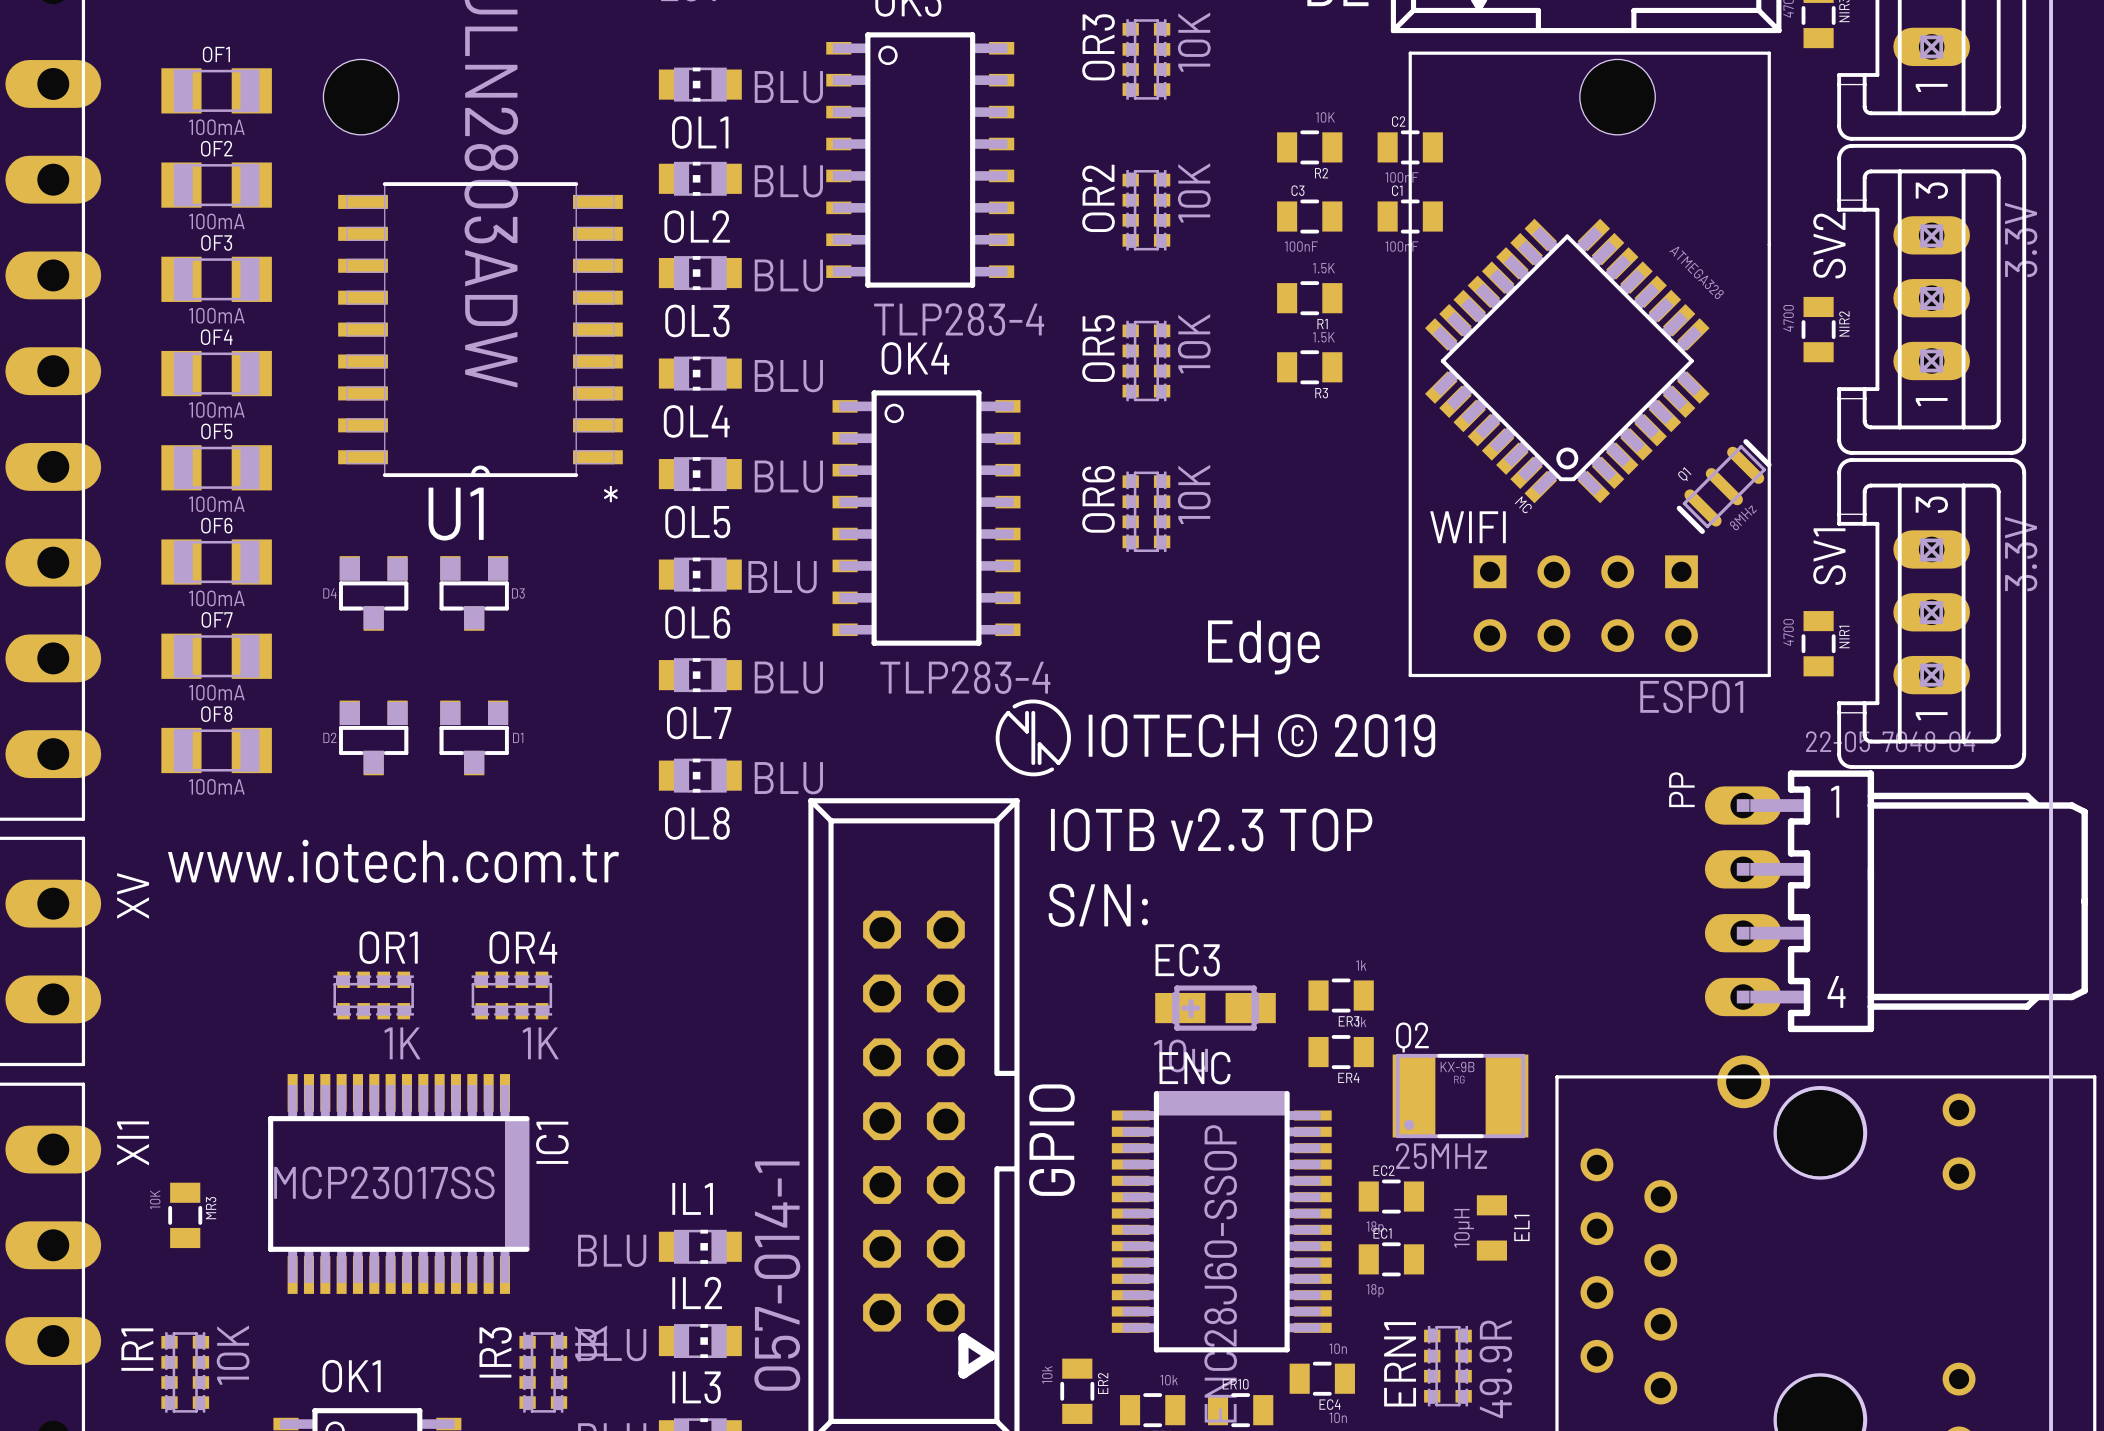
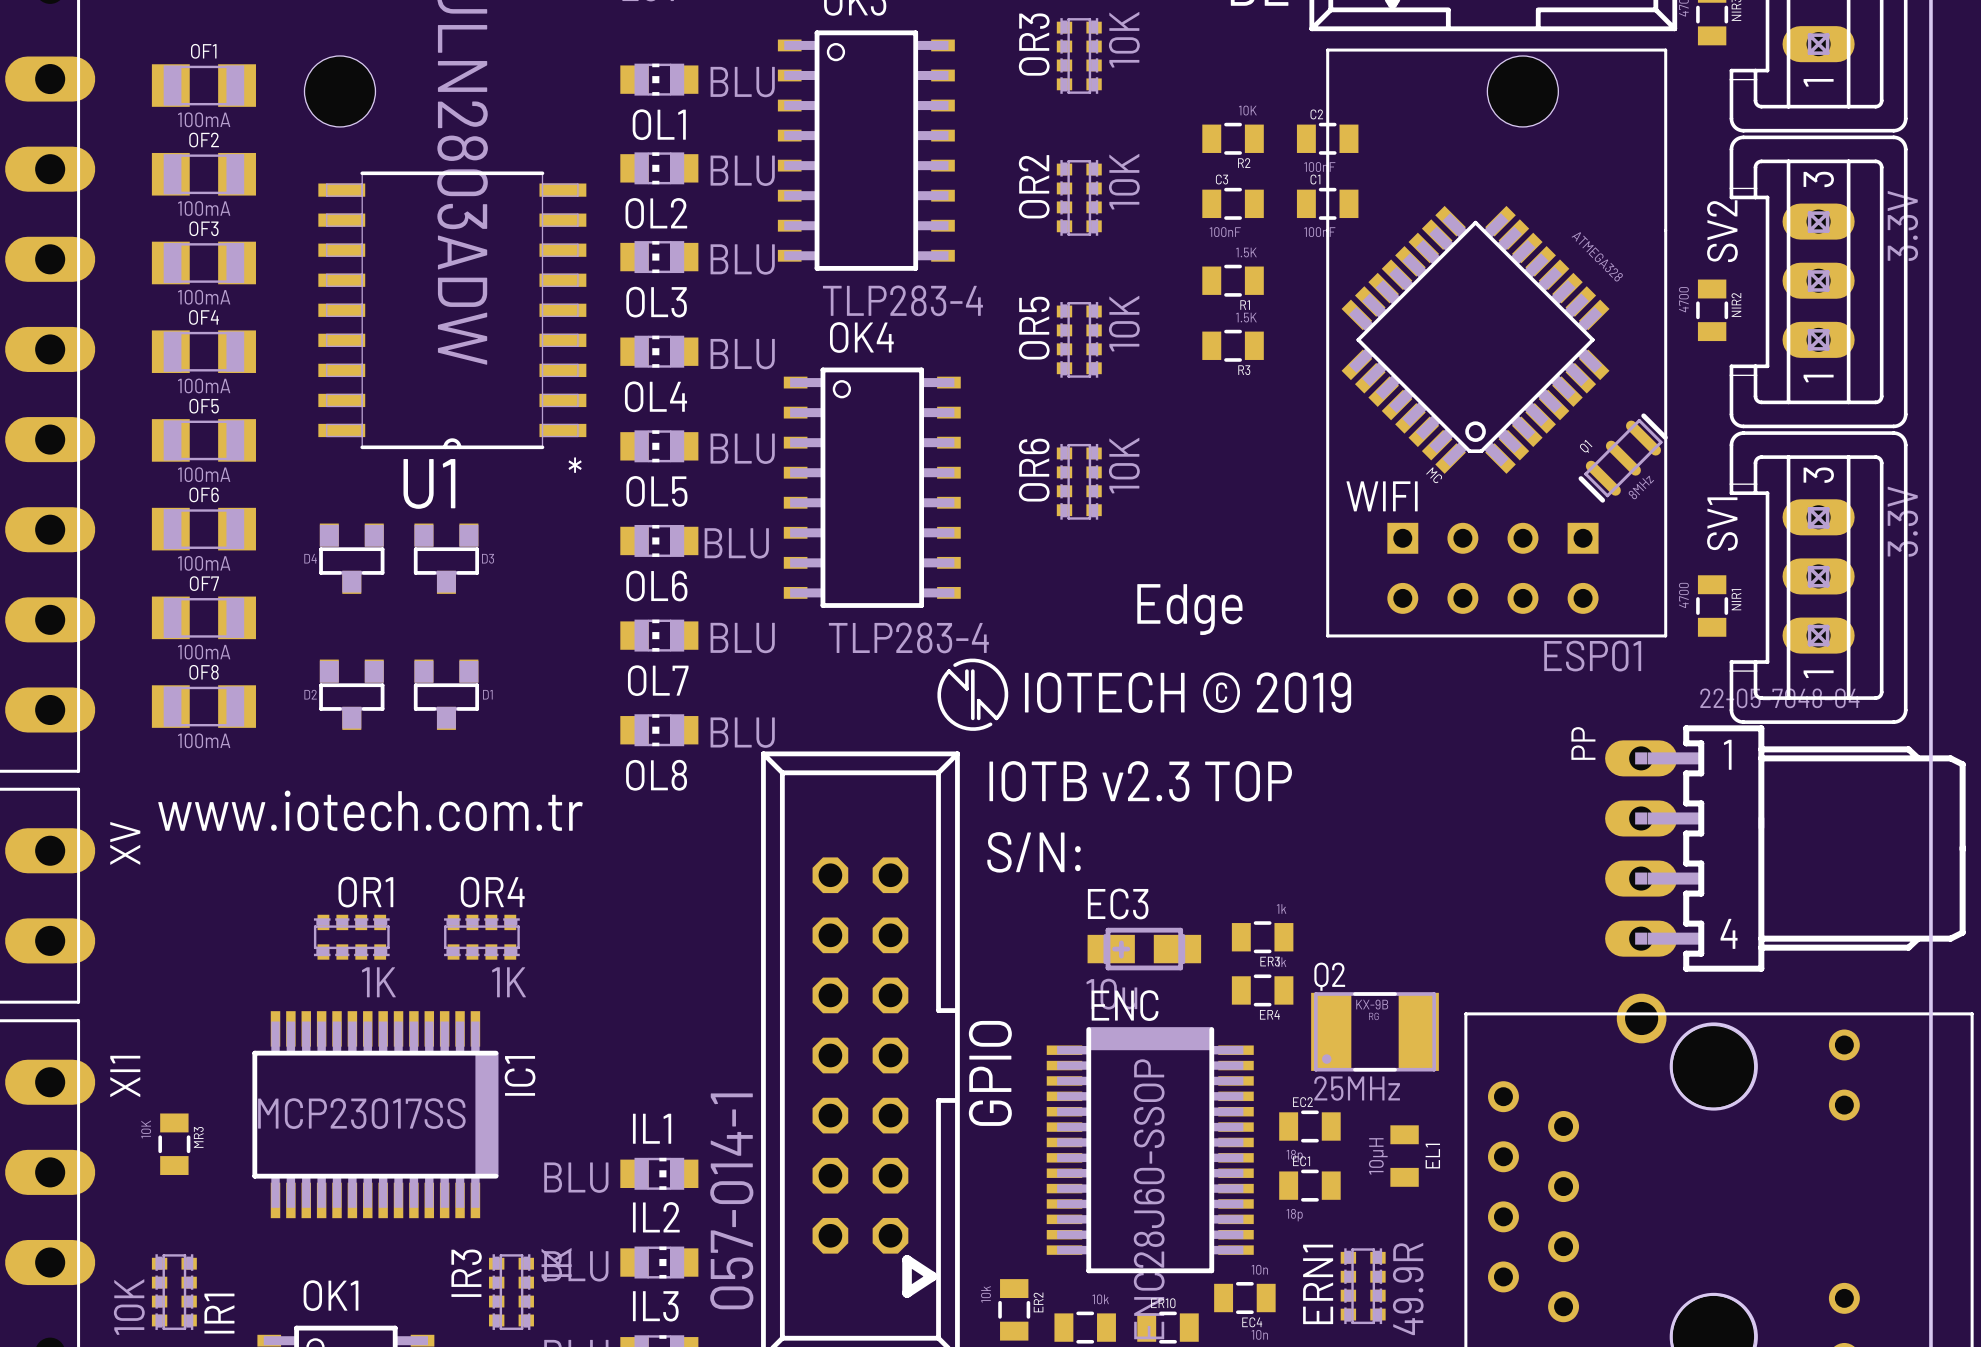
IR1 name position: IR1 (137, 1349) -> IR1 (219, 1313)
IR1 value position: 10K (233, 1355) -> 10K (129, 1307)

